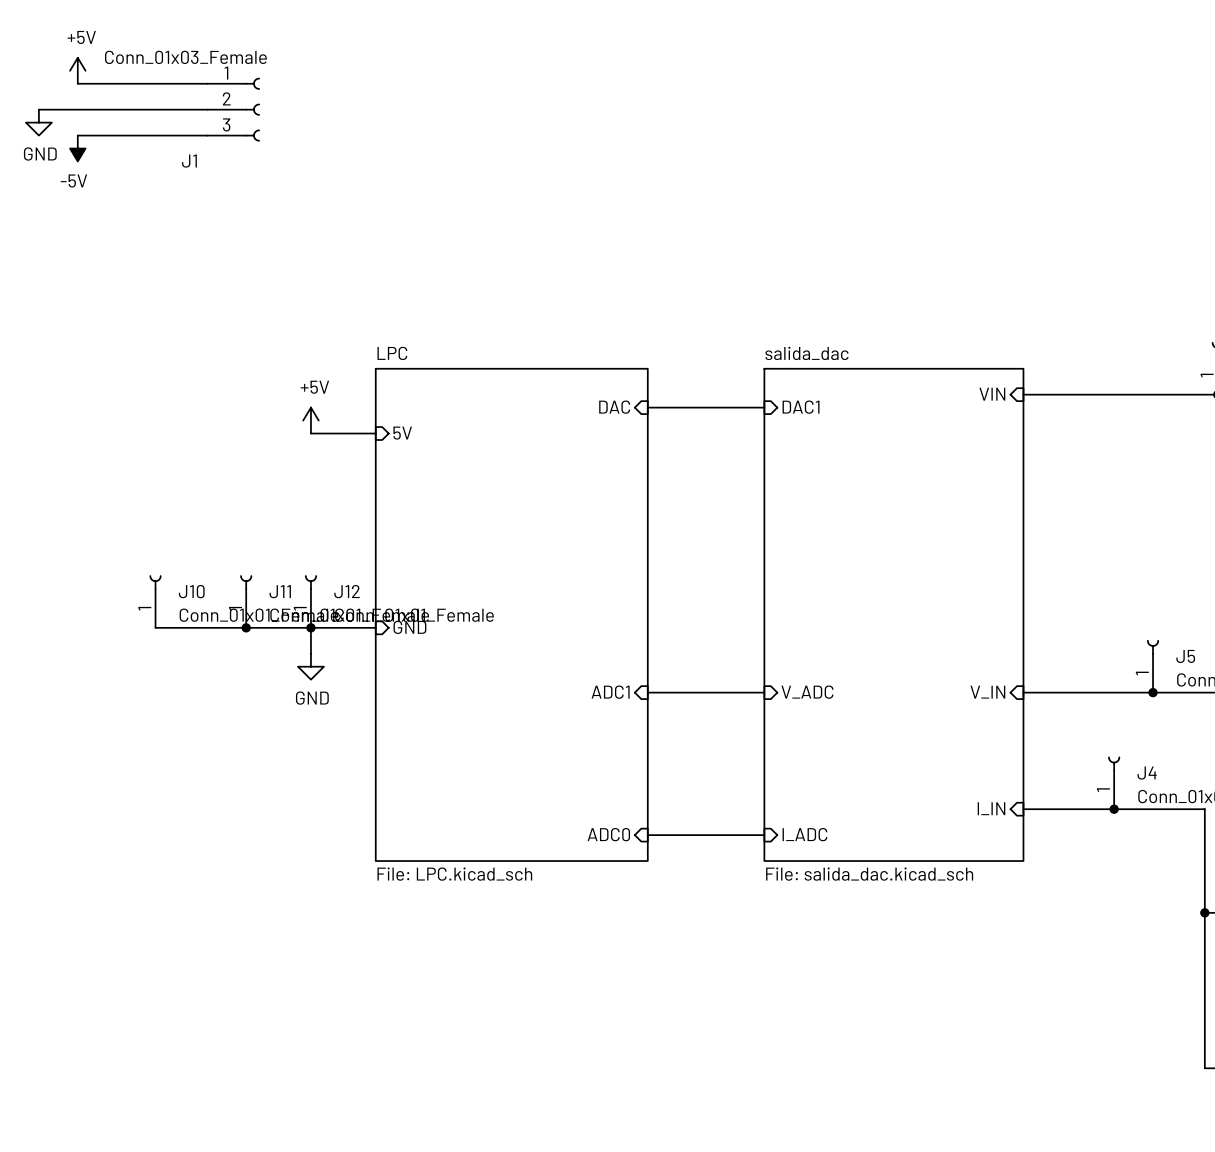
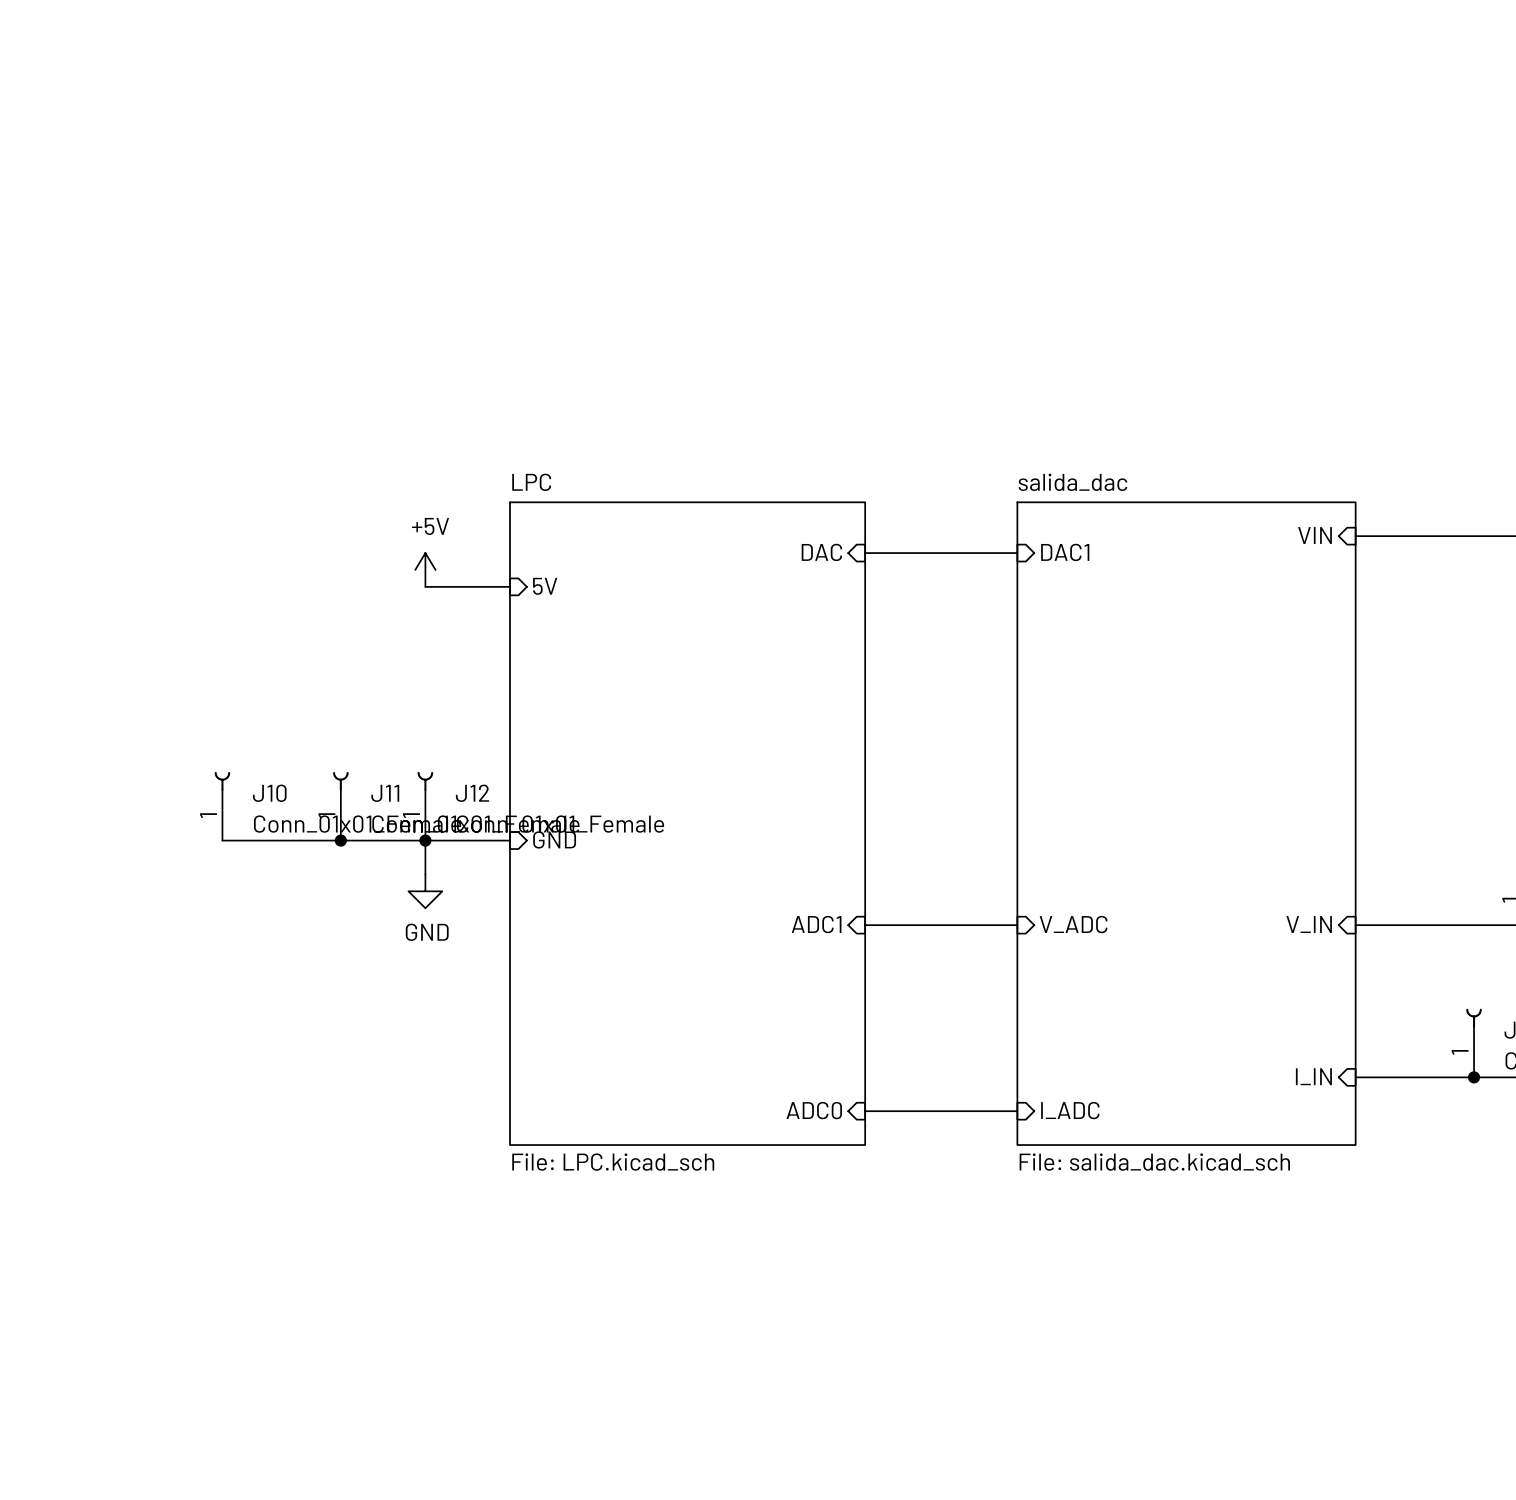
power symbol: +5V (77, 70) -> none
wire: (77, 83) (207, 83) -> none
wire: (38, 109) (207, 109) -> none
J1: Conn_01x03_Female (233, 109) -> none
power symbol: GND (38, 122) -> none
wire: (77, 135) (207, 135) -> none
power symbol: -5V (77, 148) -> none

